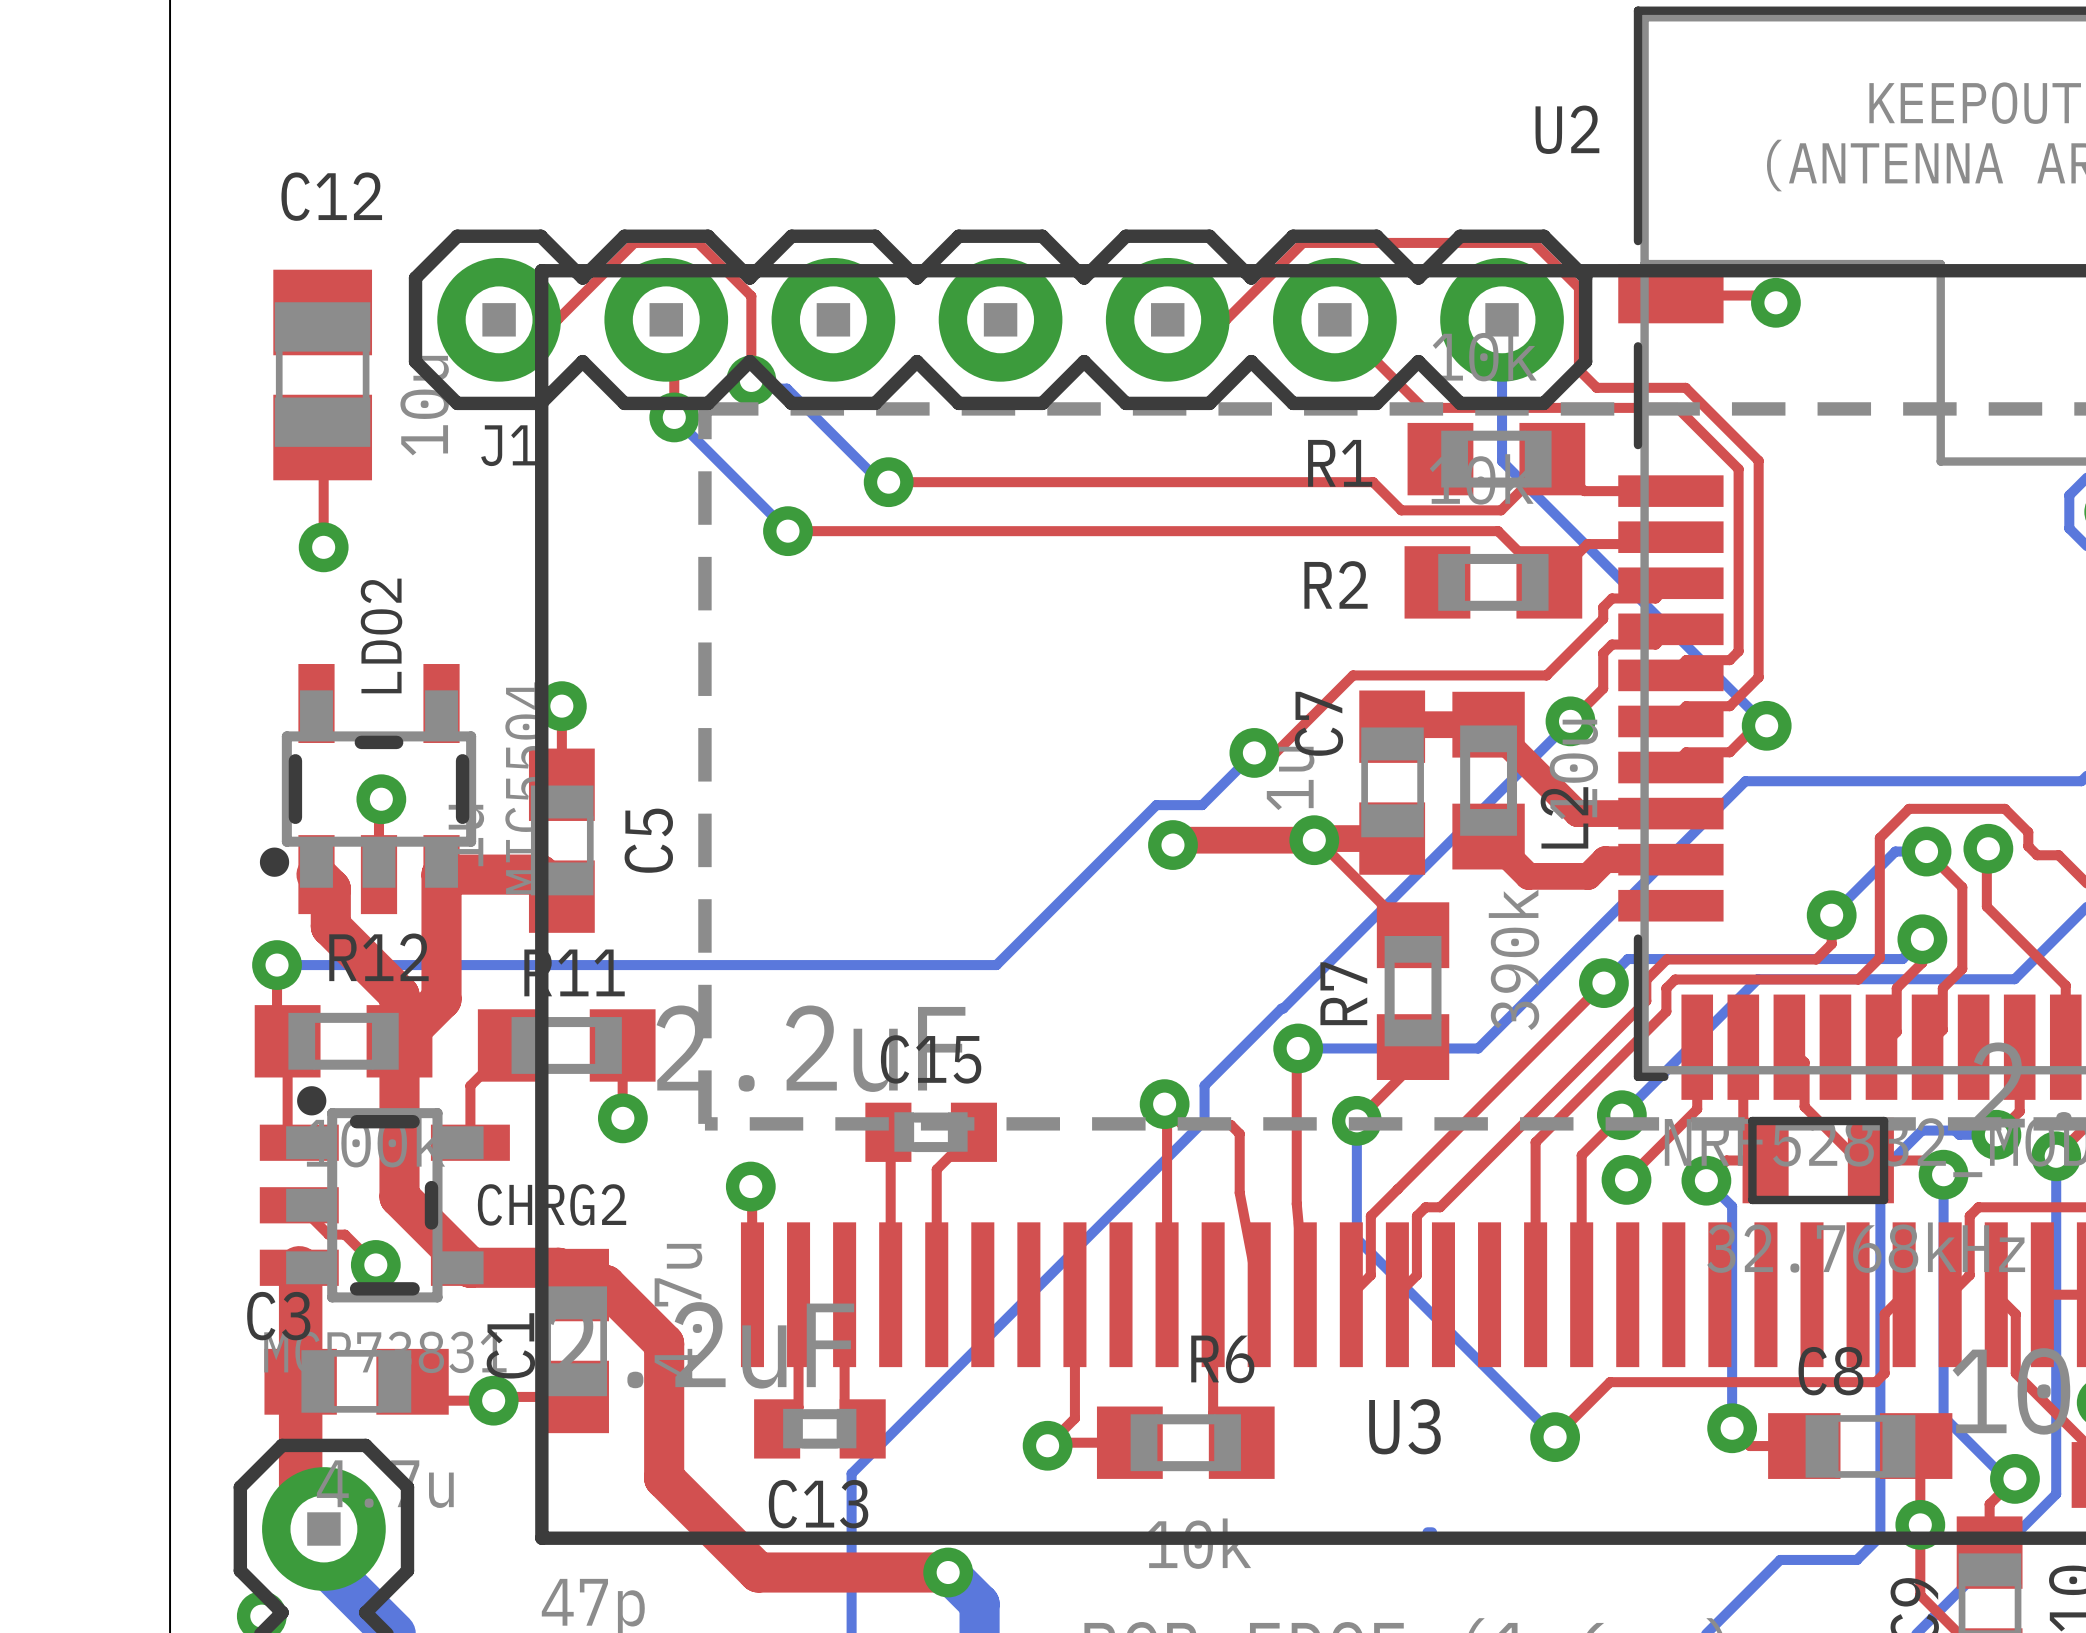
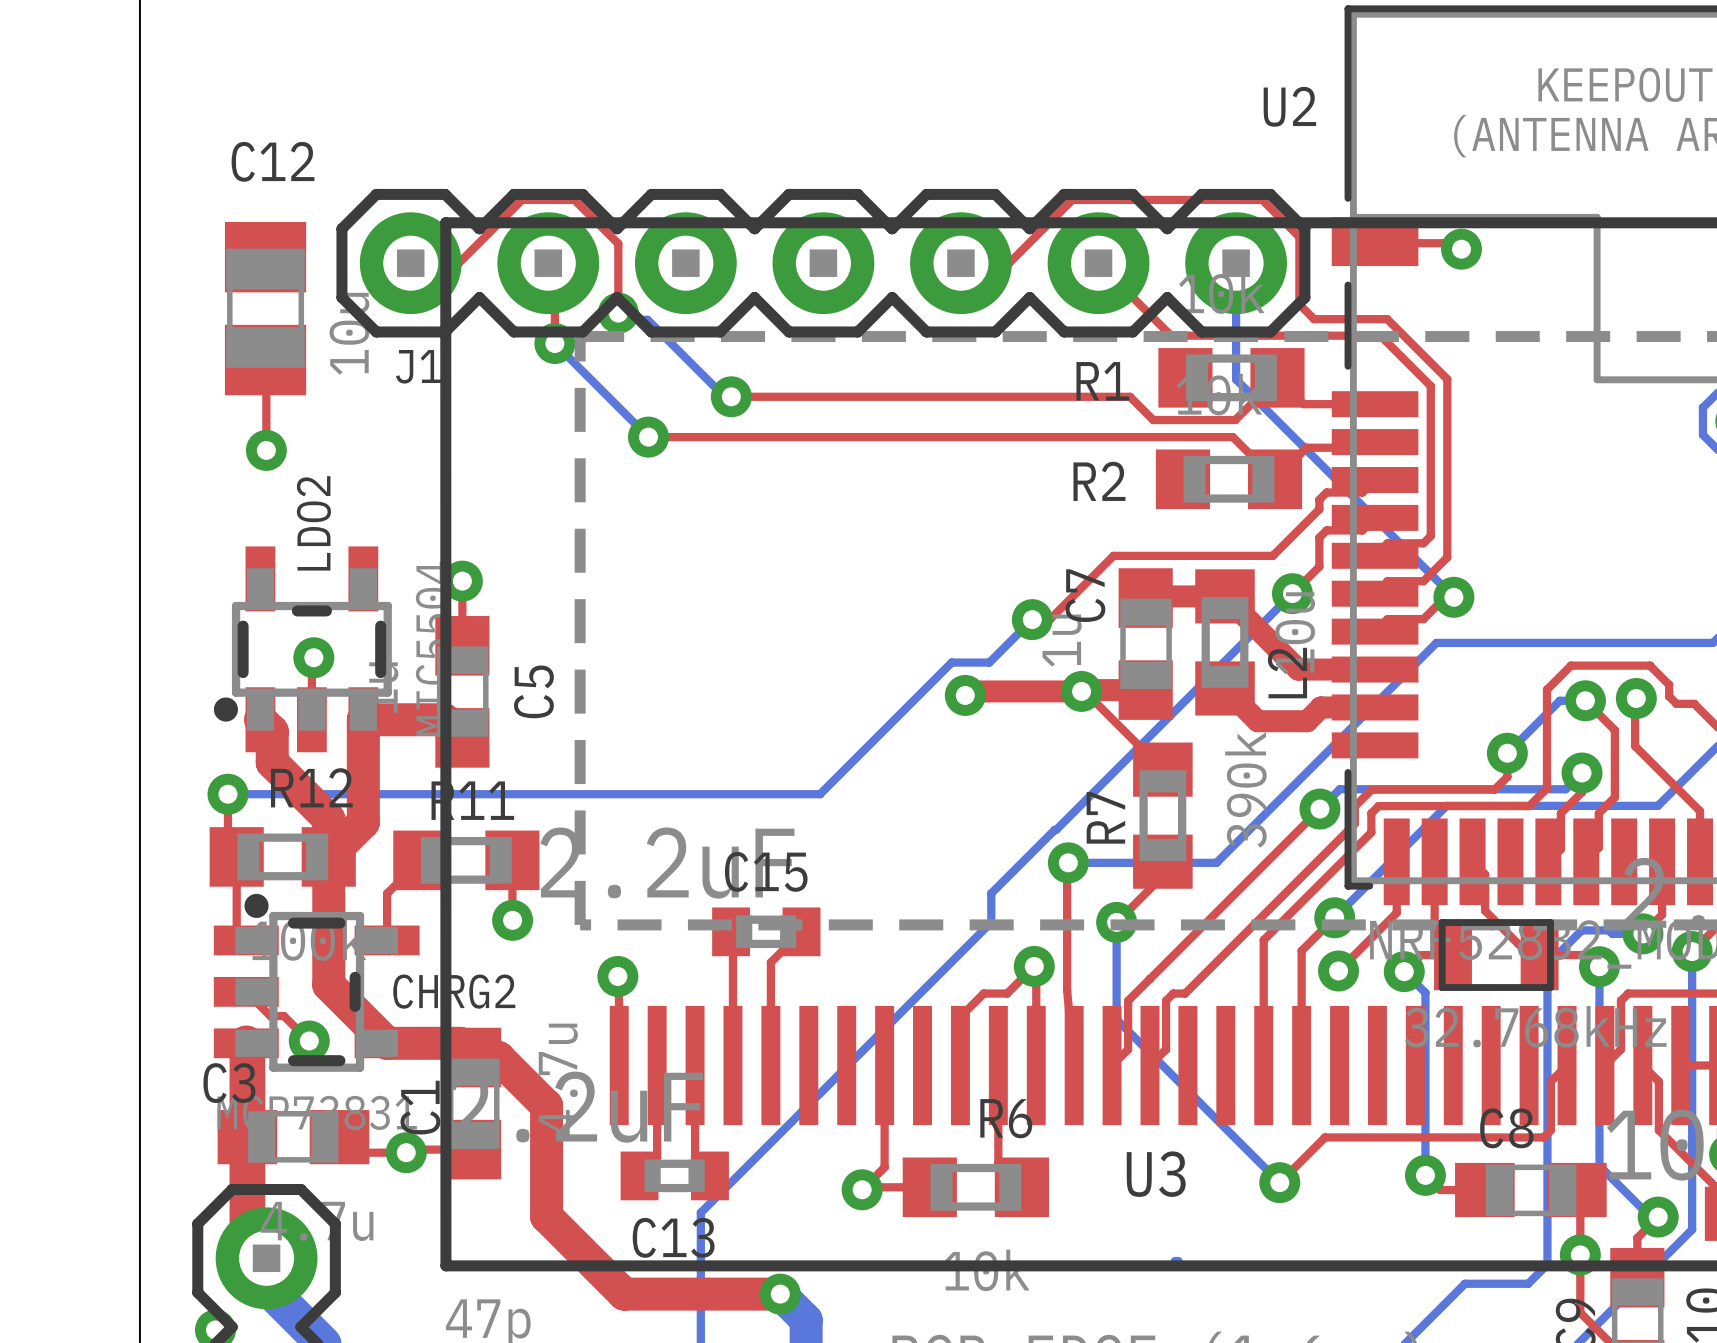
top track: (1164, 1104) (1167, 1106) (1167, 1235) -> none
via position: (1164, 1104) -> (1034, 966)
top track: (1167, 1109) (1182, 1125) (1230, 1125) (1239, 1133) (1239, 1192) (1259, 1294) -> (960, 1016) (983, 993) (1007, 993) (1034, 966) (1036, 968) (1036, 1065)

